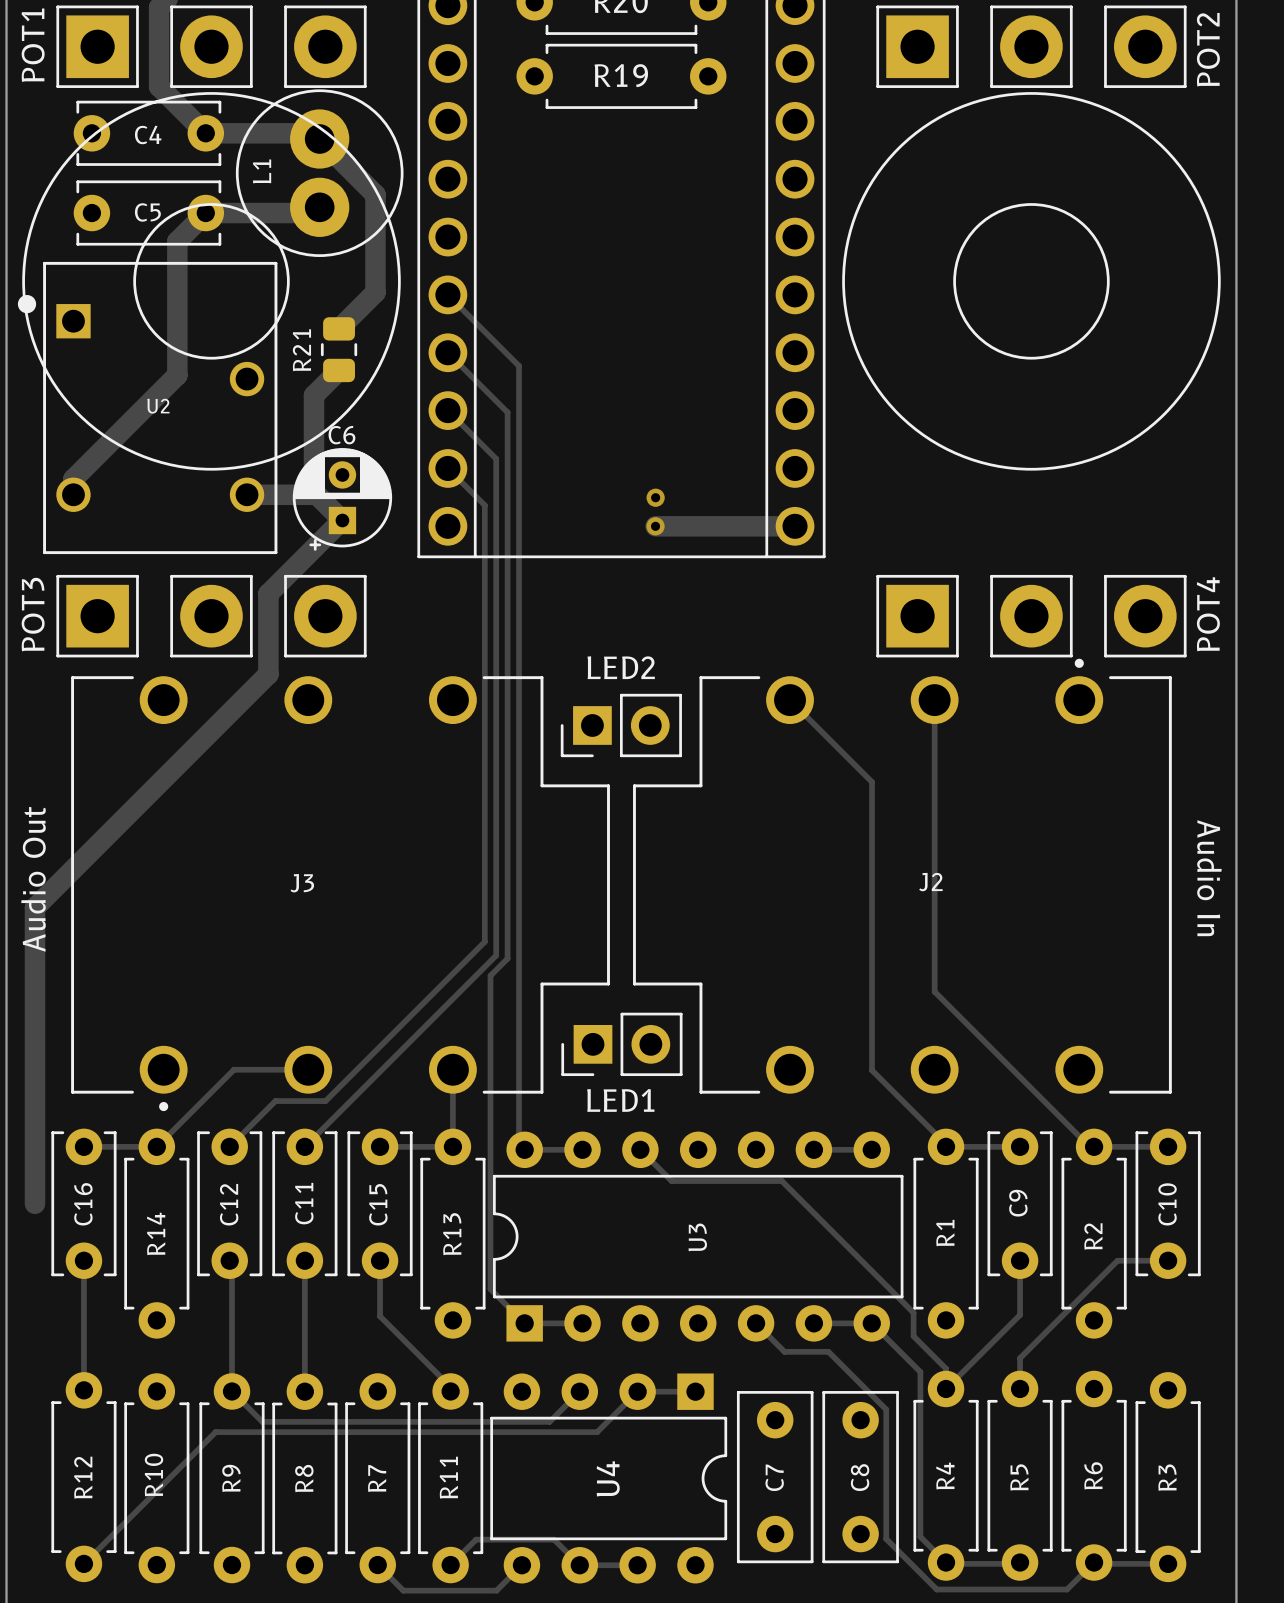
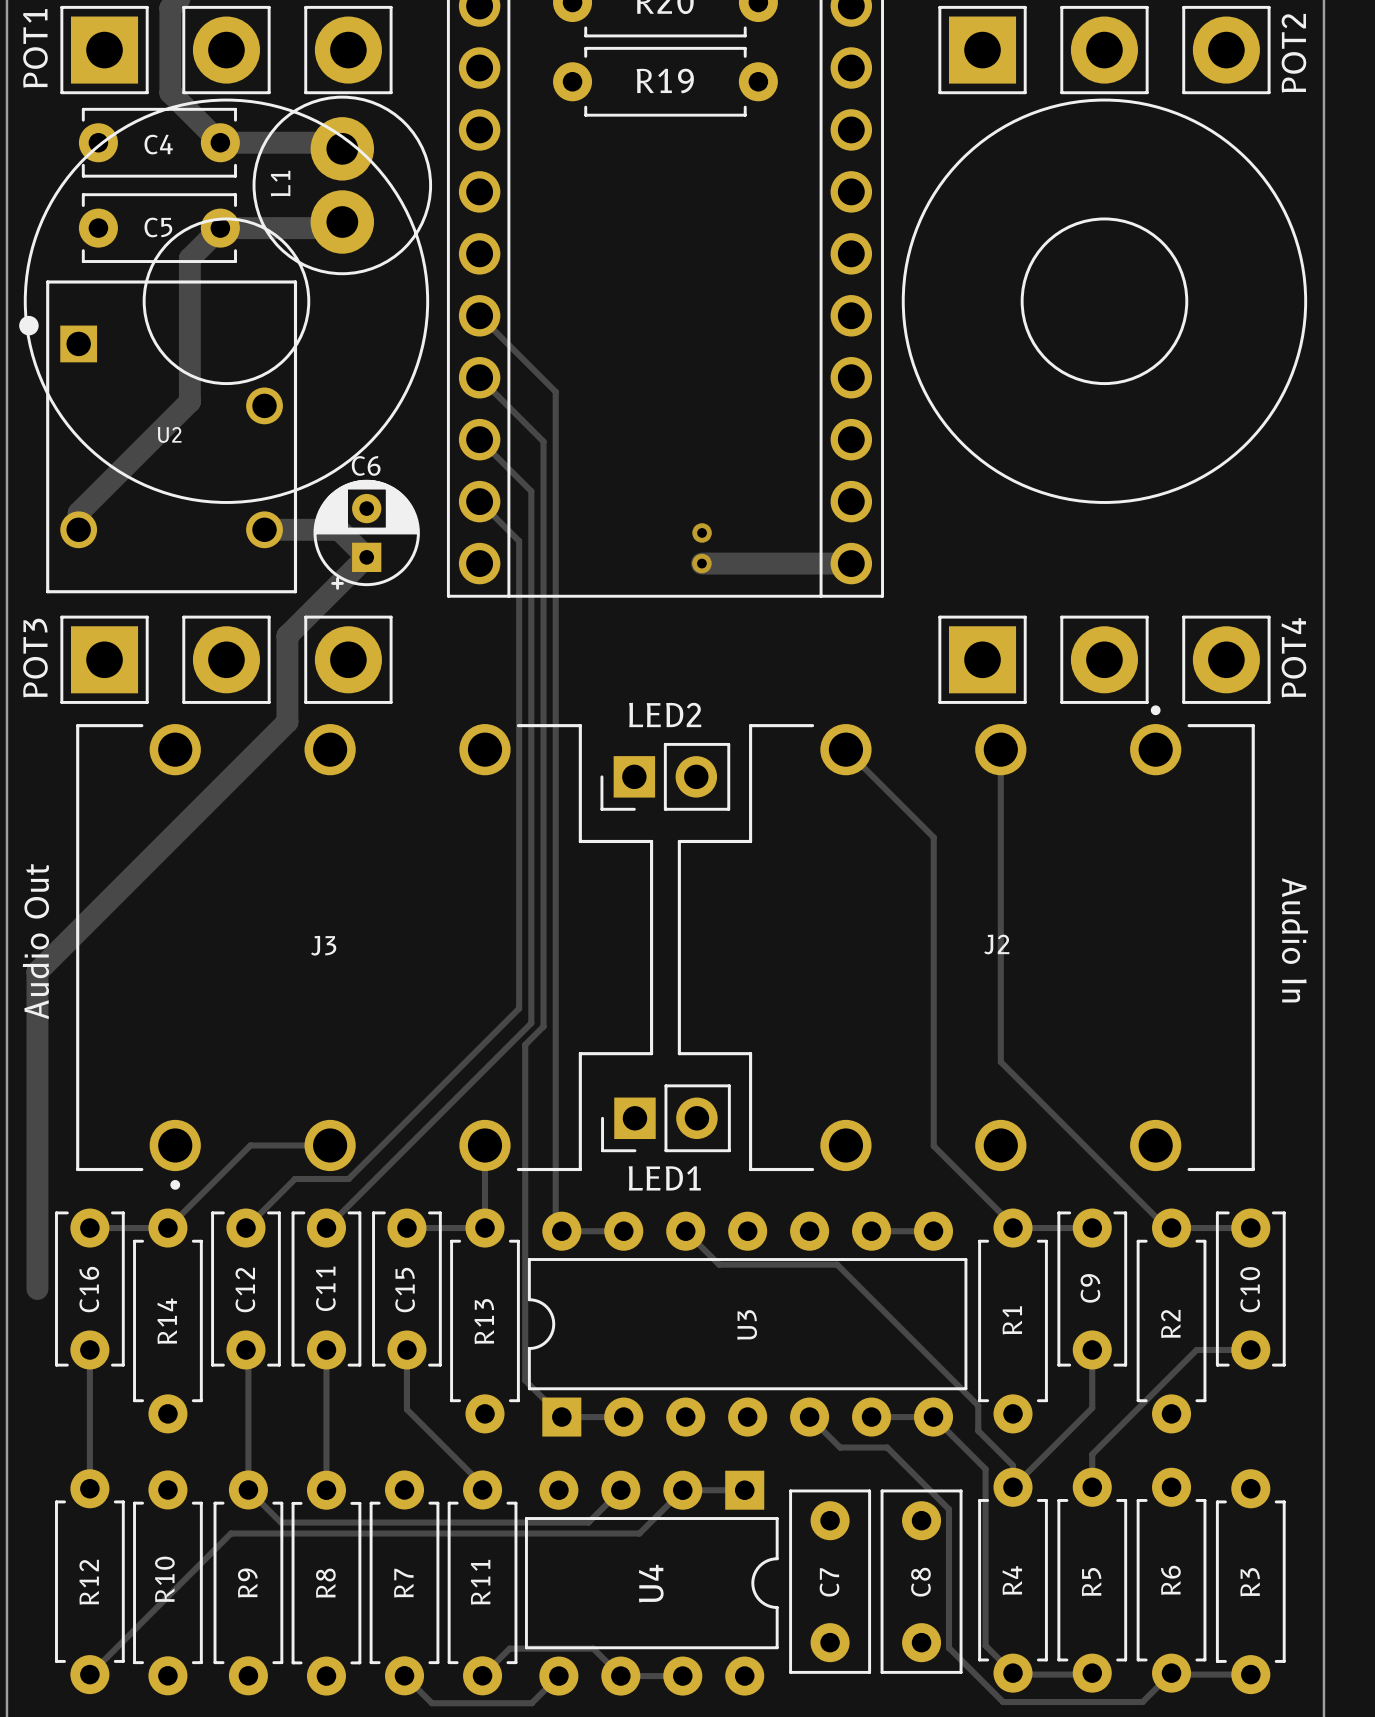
track: (319, 139) (375, 194) (375, 292) (339, 328) -> none
R21: (339, 349) -> none
track: (339, 370) (313, 395) (313, 492) (316, 494) -> none

